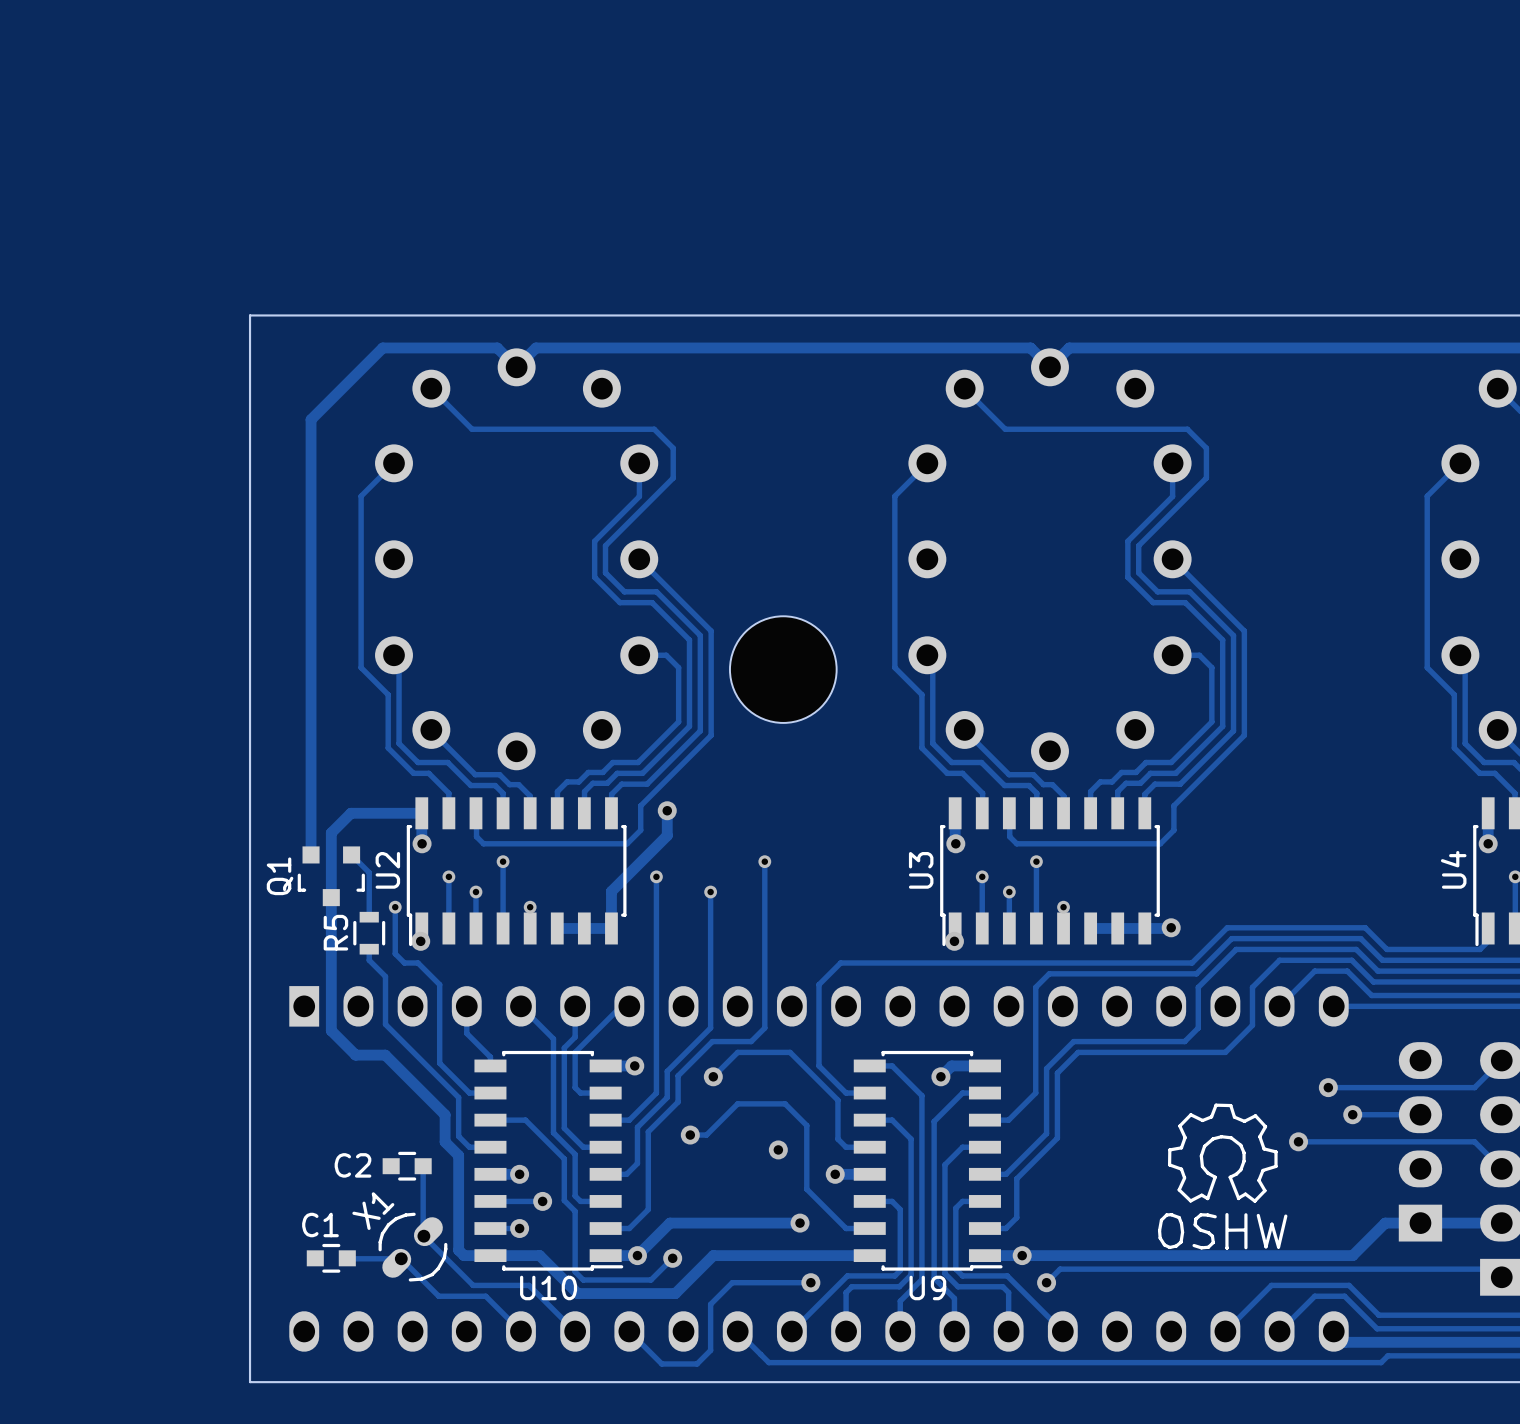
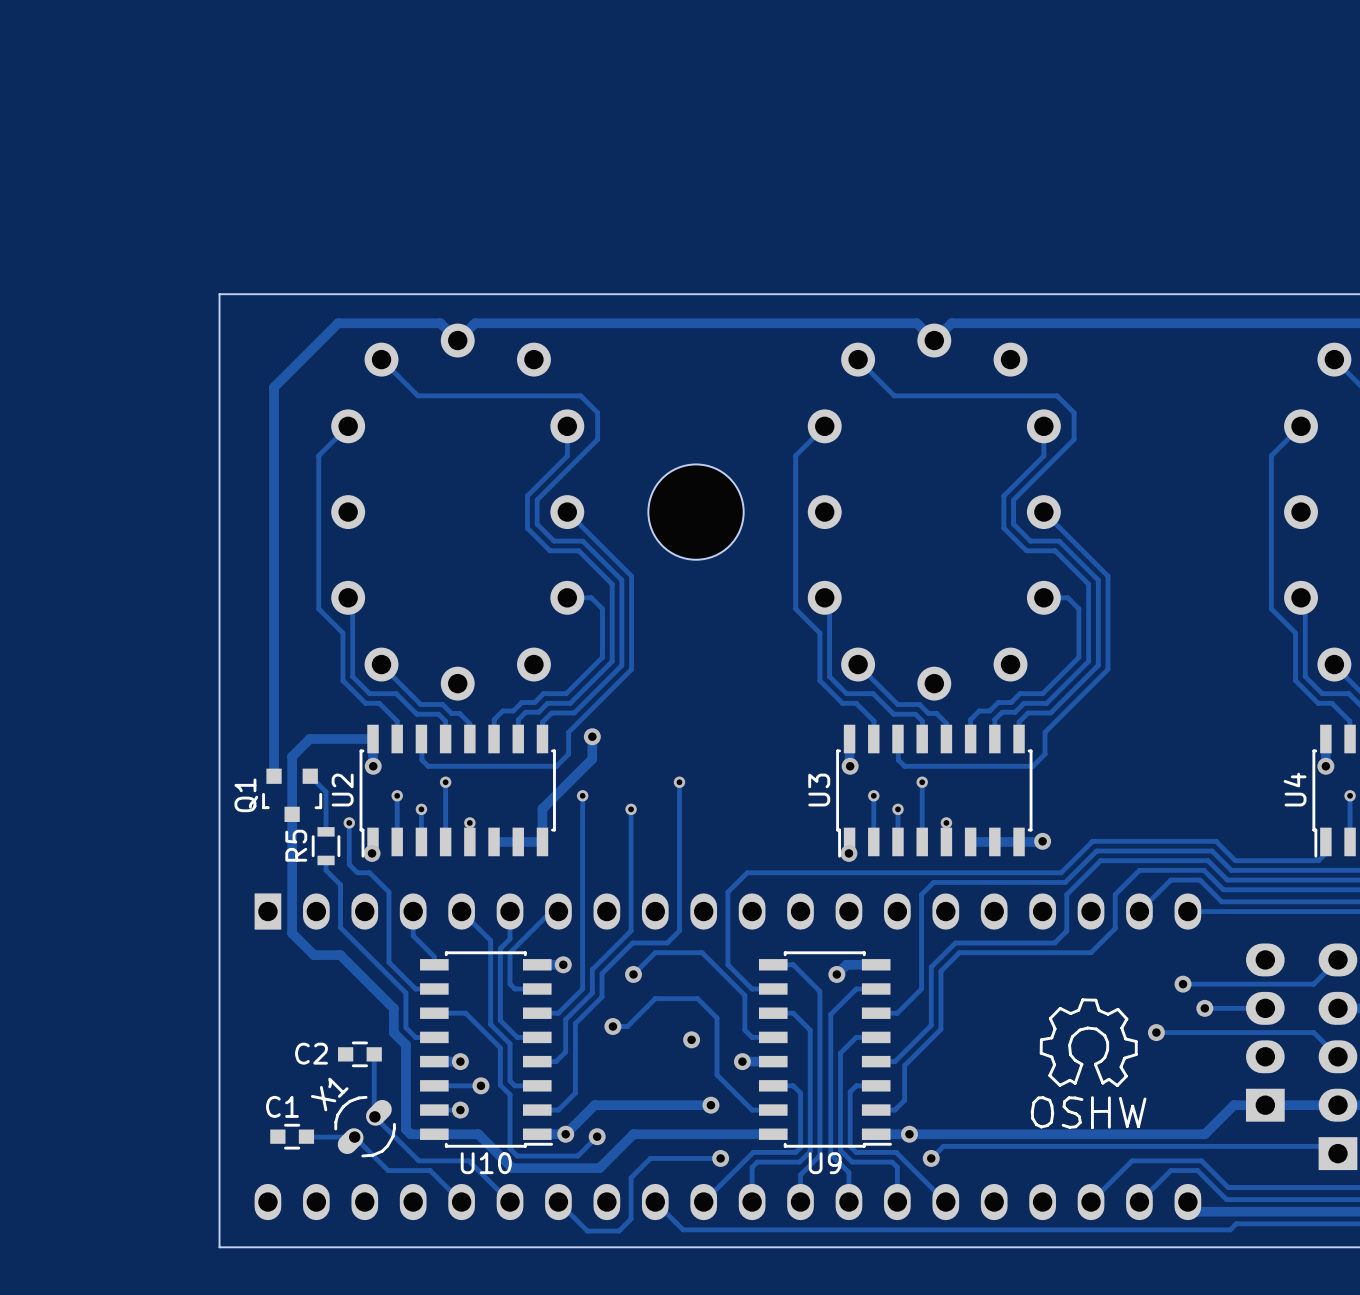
part position: (783, 669) -> (696, 512)

